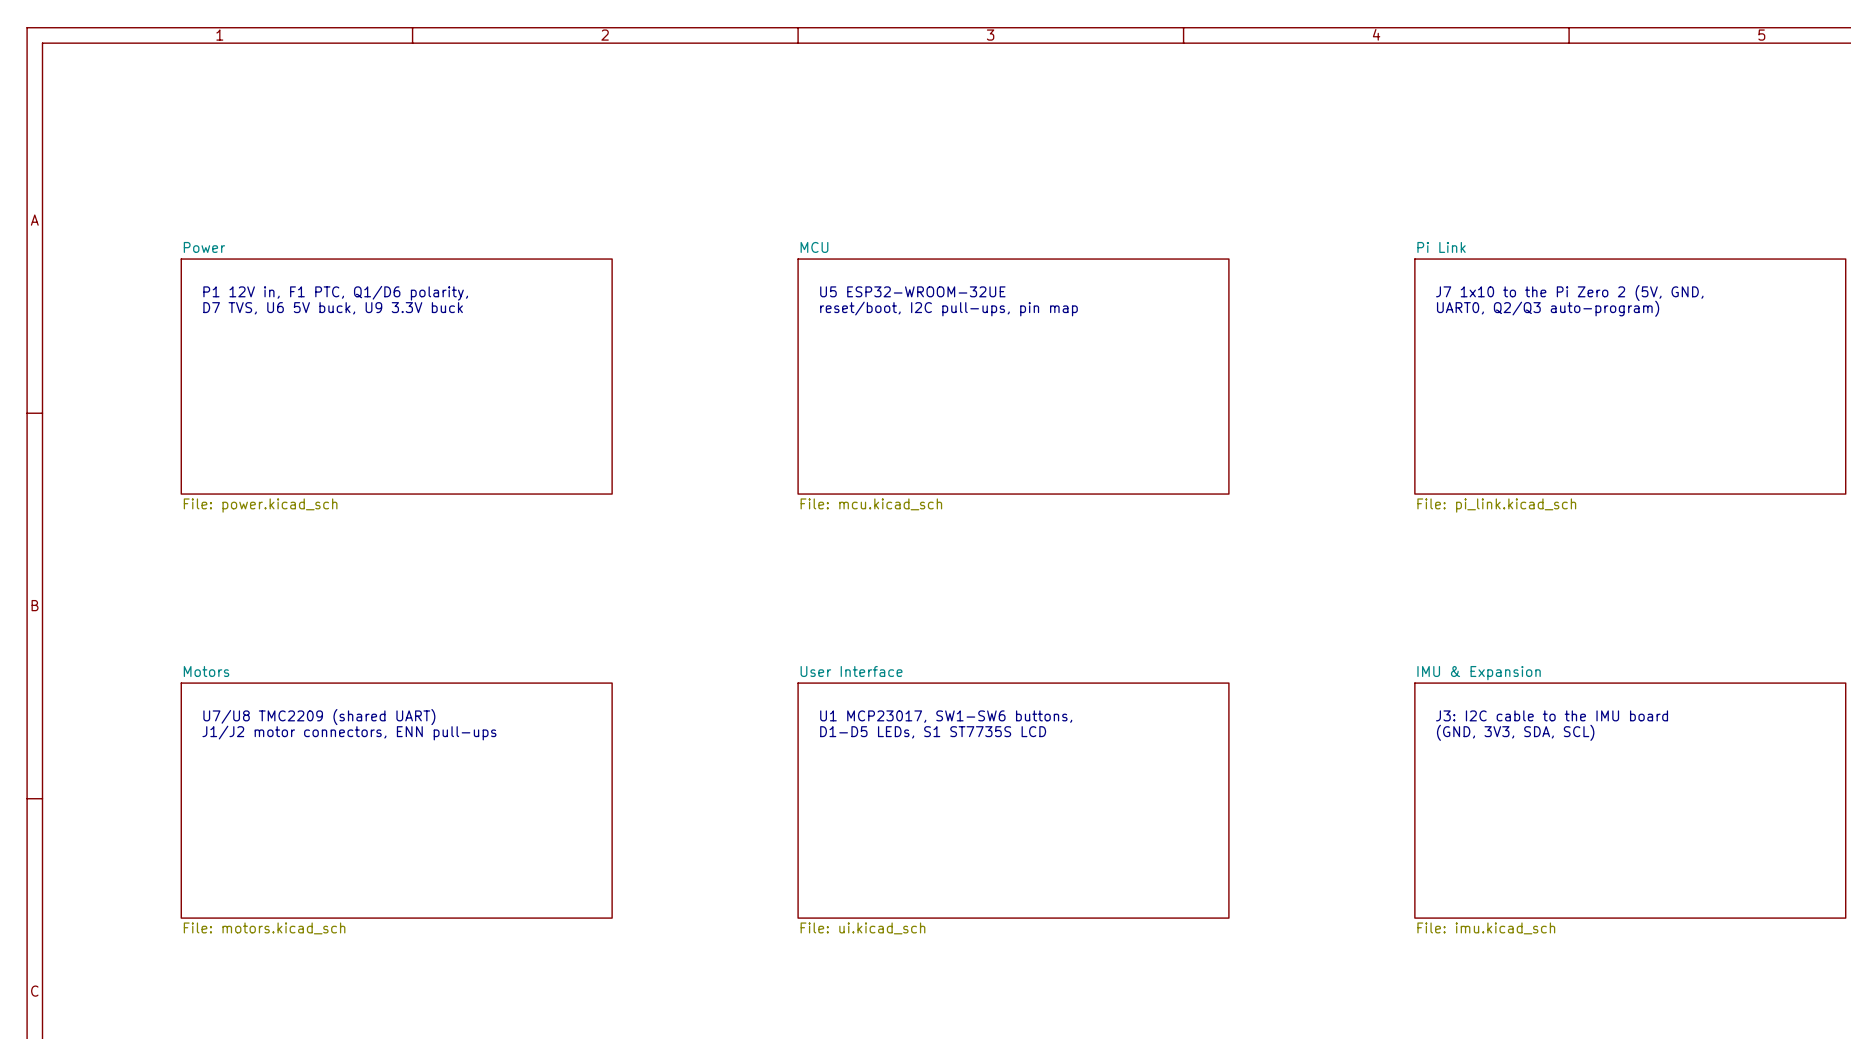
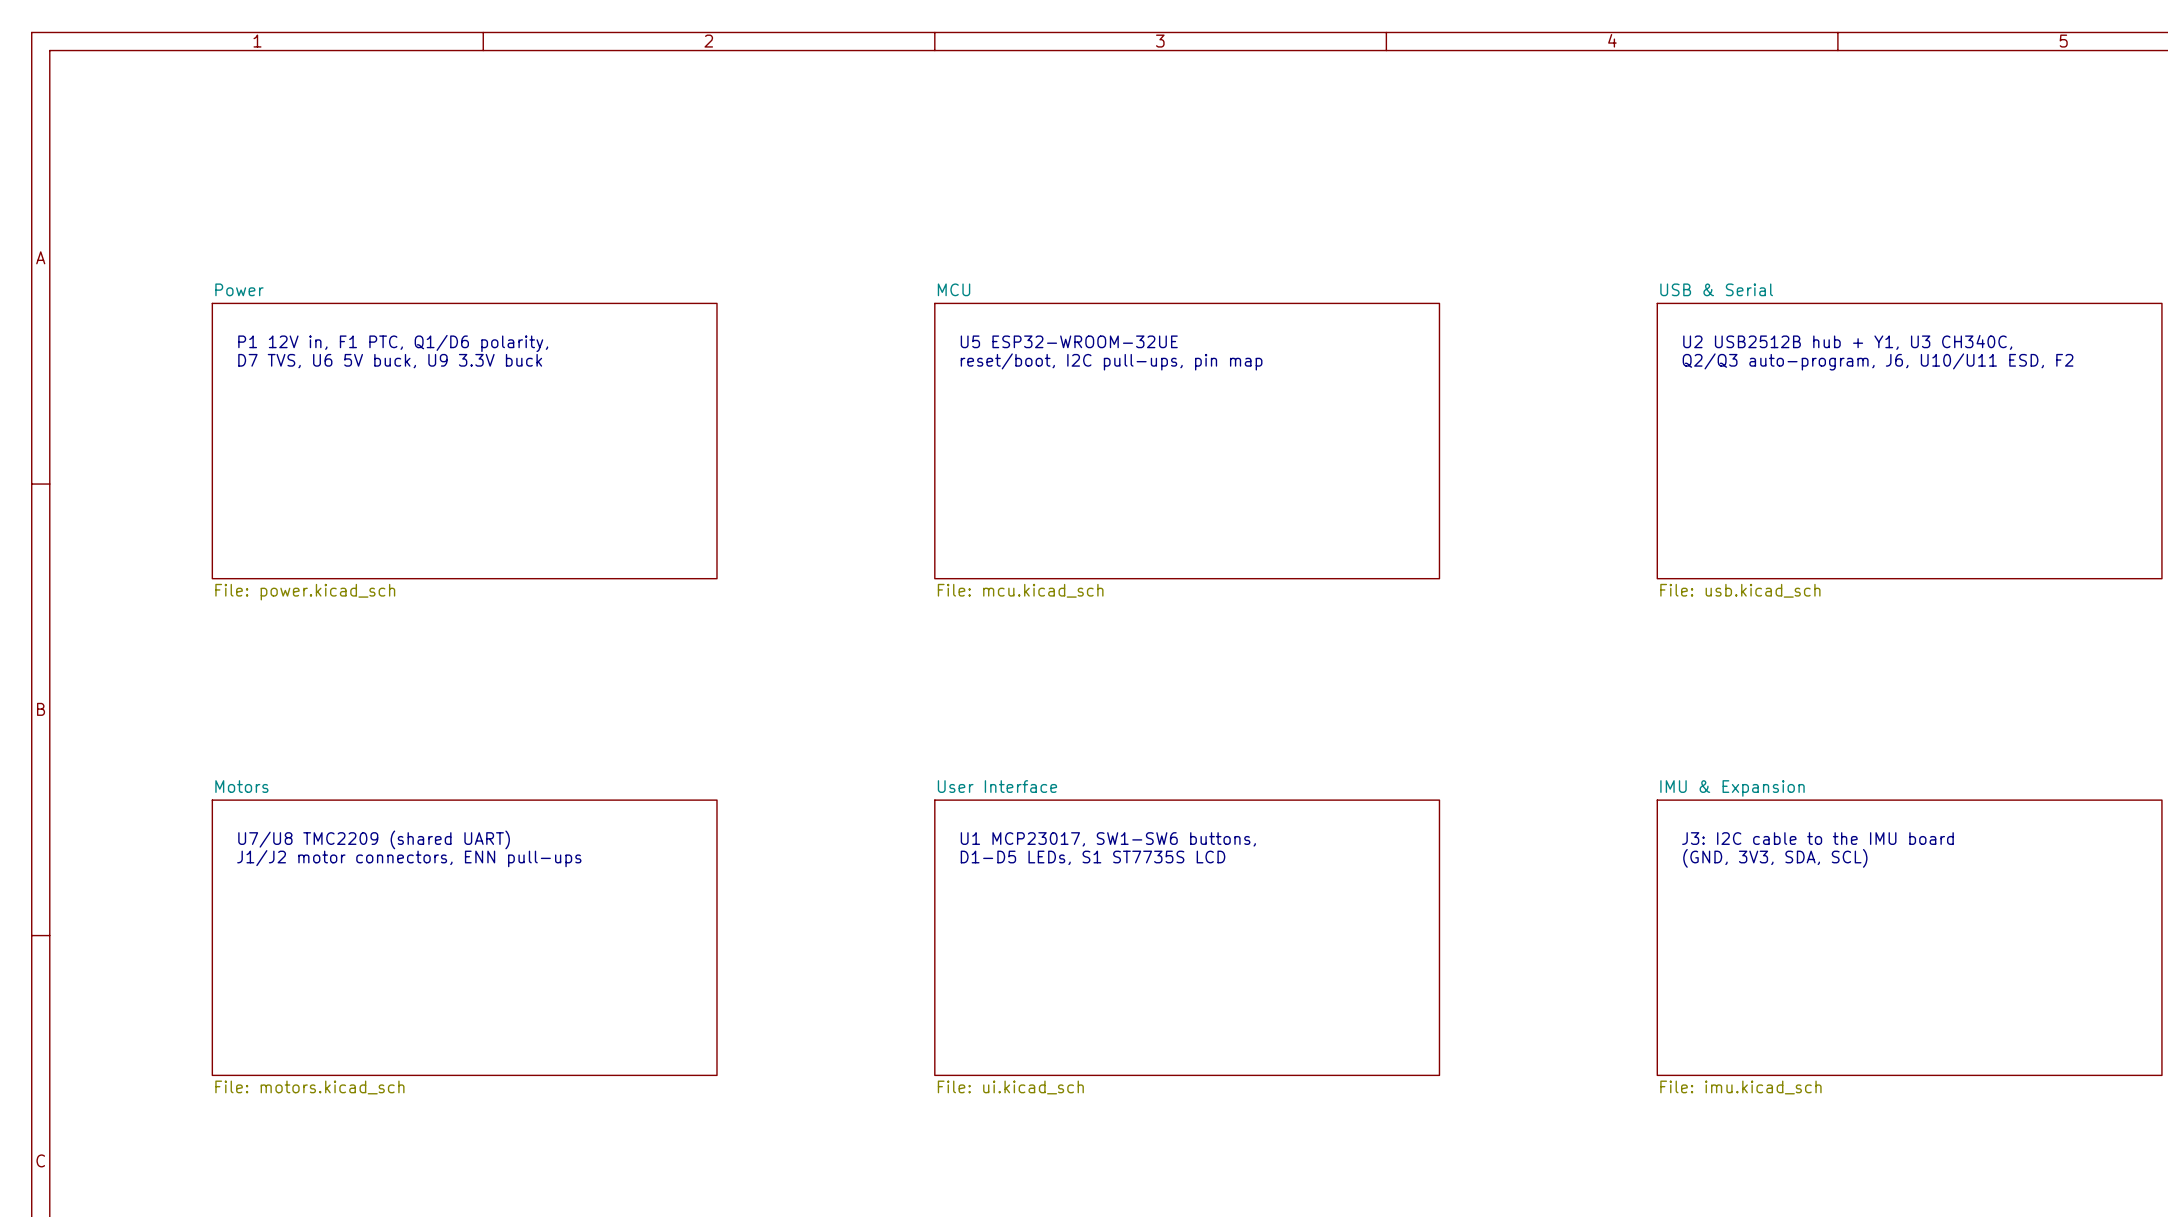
sheet Pi Link name: Pi Link (1441, 247) -> USB & Serial (1716, 289)
text: J7 1x10 to the Pi Zero 2 (5V, GND, (1569, 293) -> U2 USB2512B hub + Y1, U3 CH340C, (1847, 342)
text: UART0, Q2/Q3 auto-program) (1548, 308) -> Q2/Q3 auto-program, J6, U10/U11 ESD, F2 (1878, 361)
sheet Pi Link value: File: pi_link.kicad_sch (1496, 505) -> File: usb.kicad_sch (1740, 590)

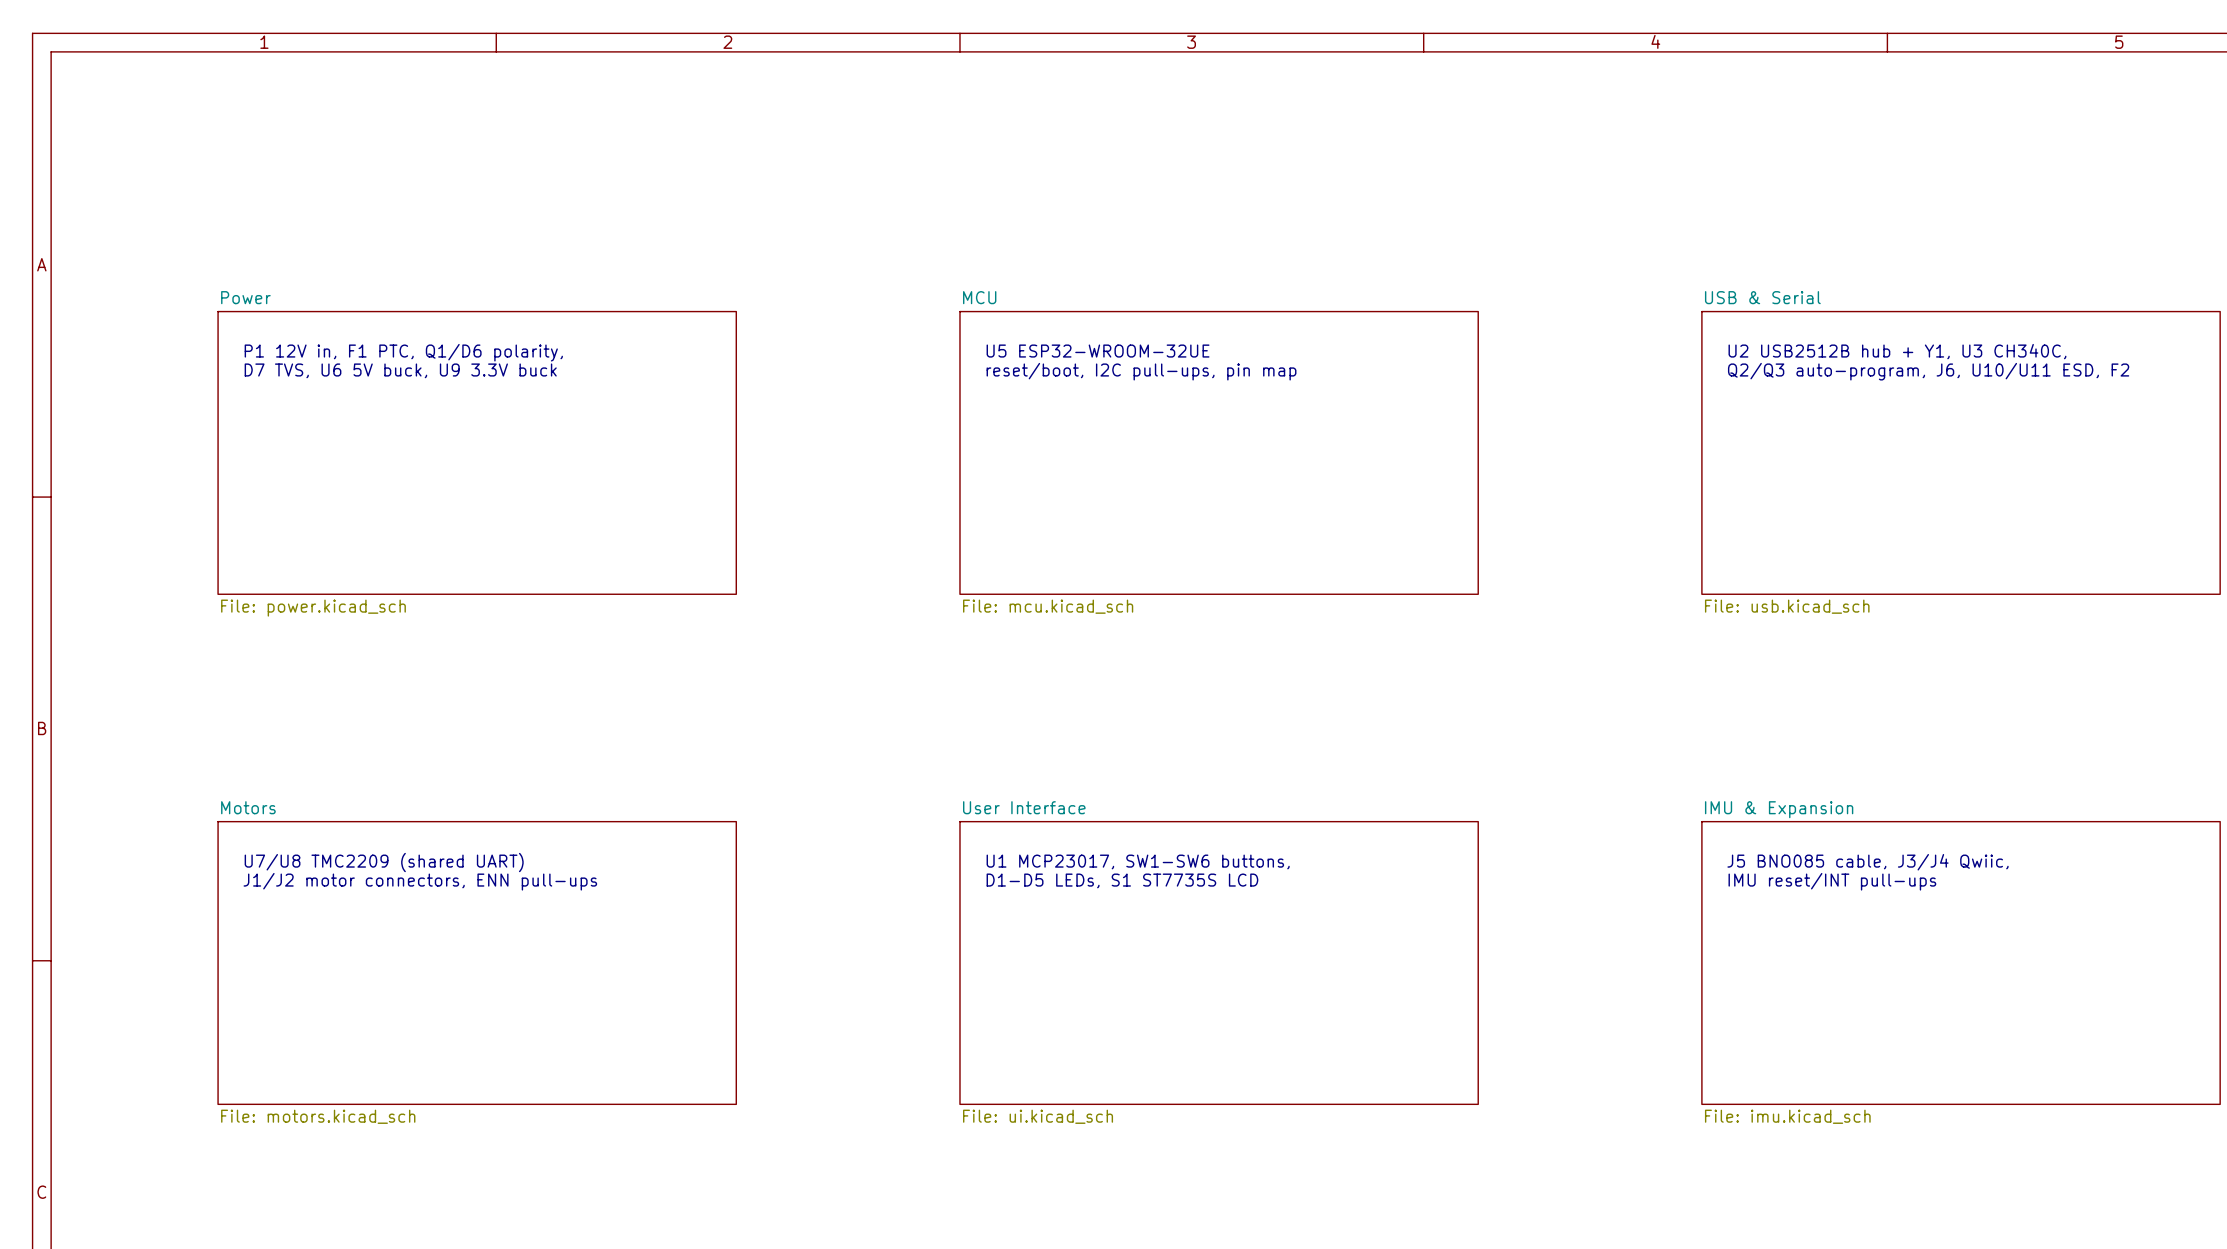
text: J3: I2C cable to the IMU board (1817, 838) -> J5 BNO085 cable, J3/J4 Qwiic, (1868, 862)
text: (GND, 3V3, SDA, SCL) (1775, 858) -> IMU reset/INT pull-ups (1832, 881)

